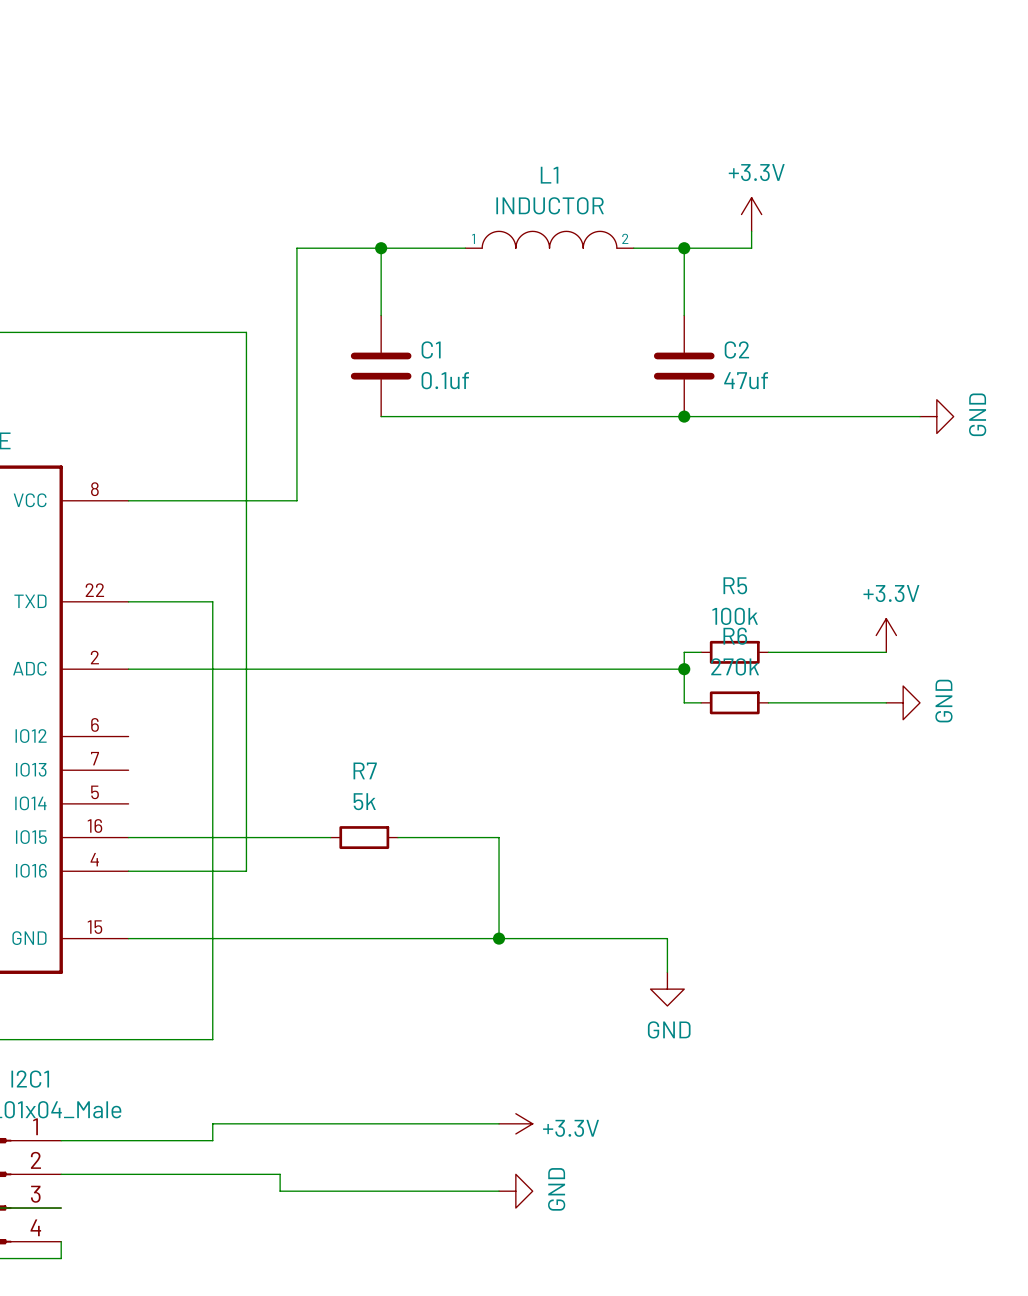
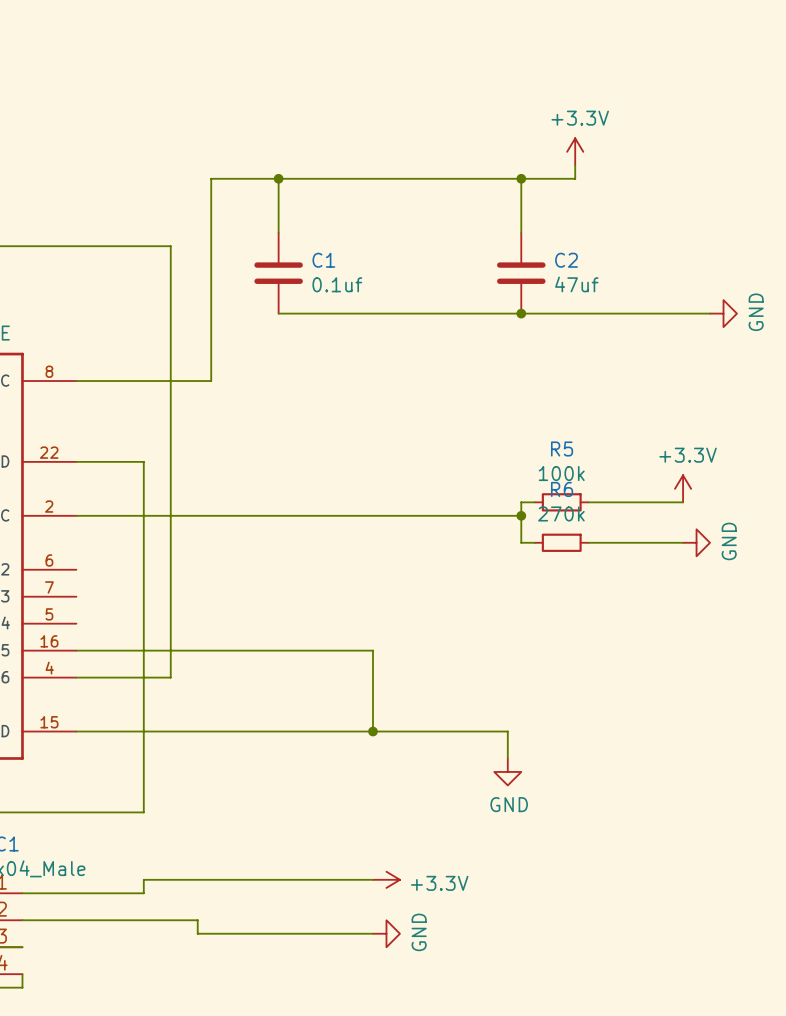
L1: INDUCTOR (549, 239) -> none
wire: none -> (346, 178) (480, 178)
wire: none -> (238, 650) (292, 650)
R7: 5k (364, 837) -> none

